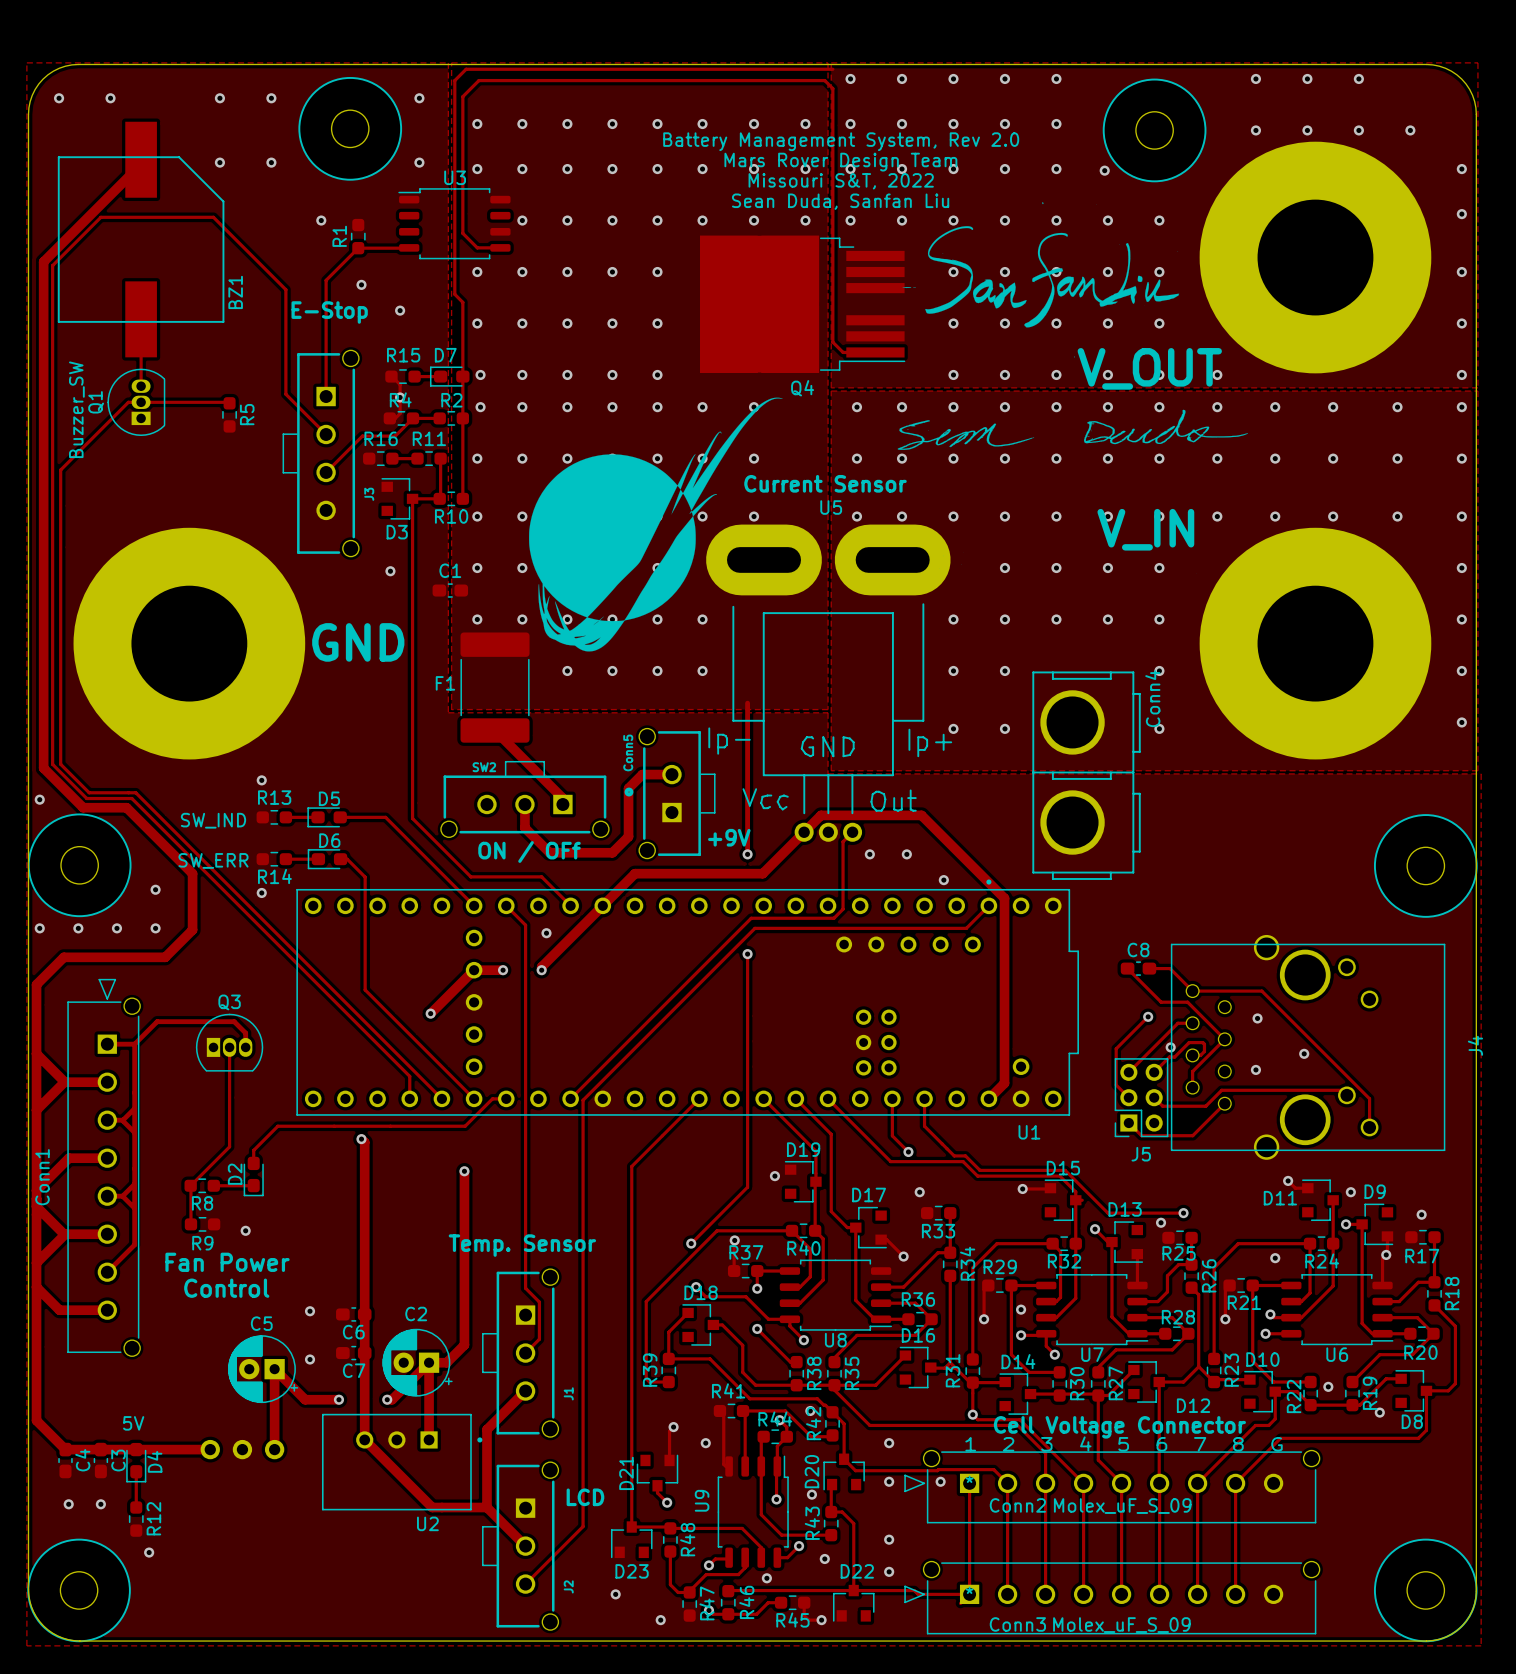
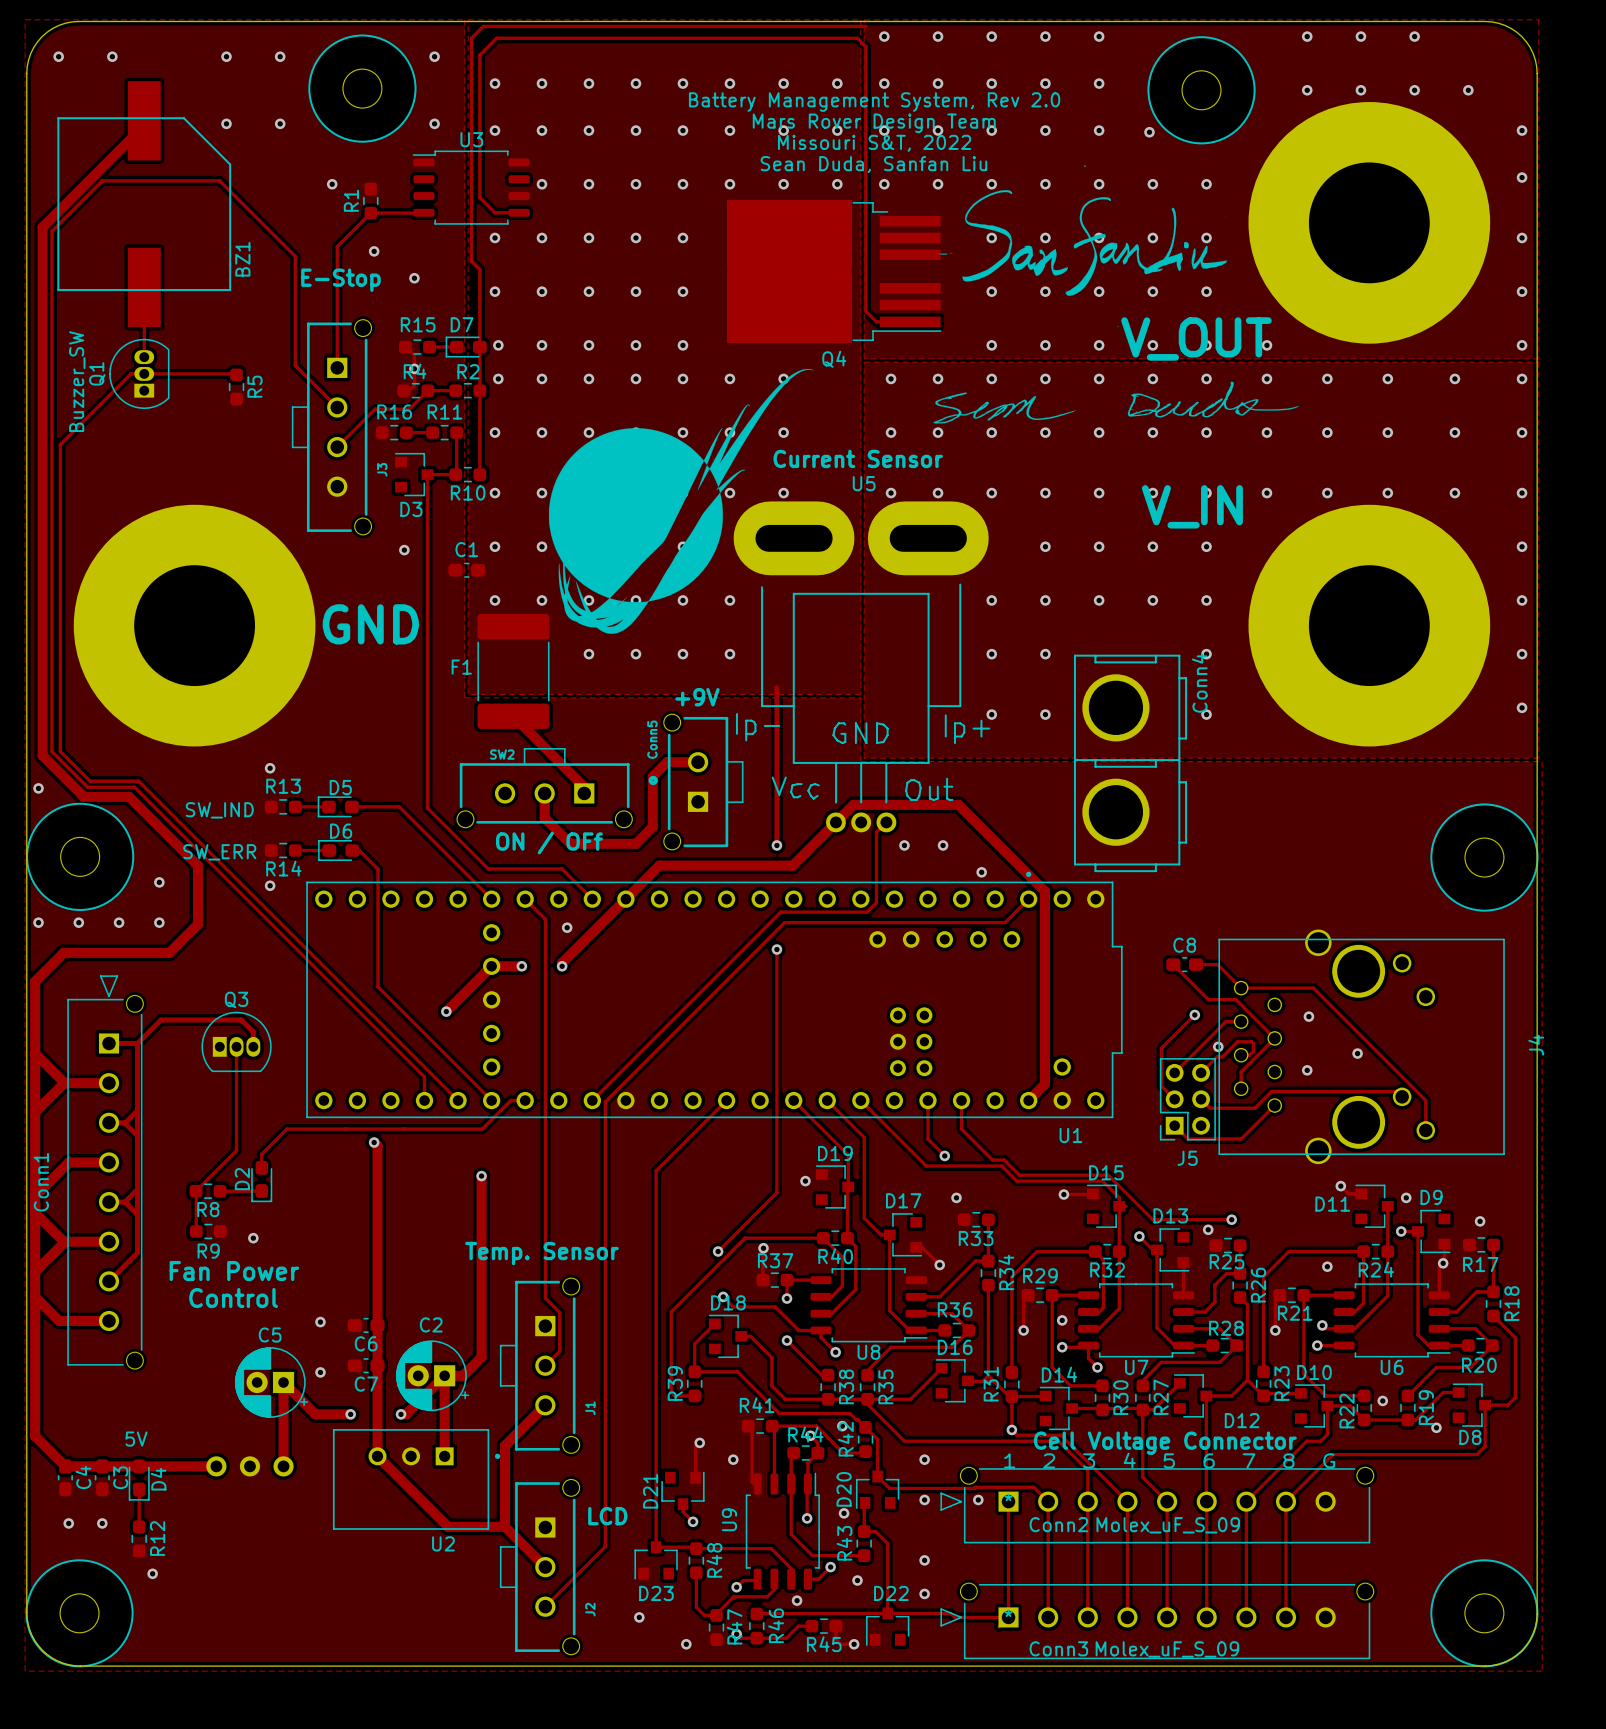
text position: +9V (729, 837) -> +9V (697, 697)

